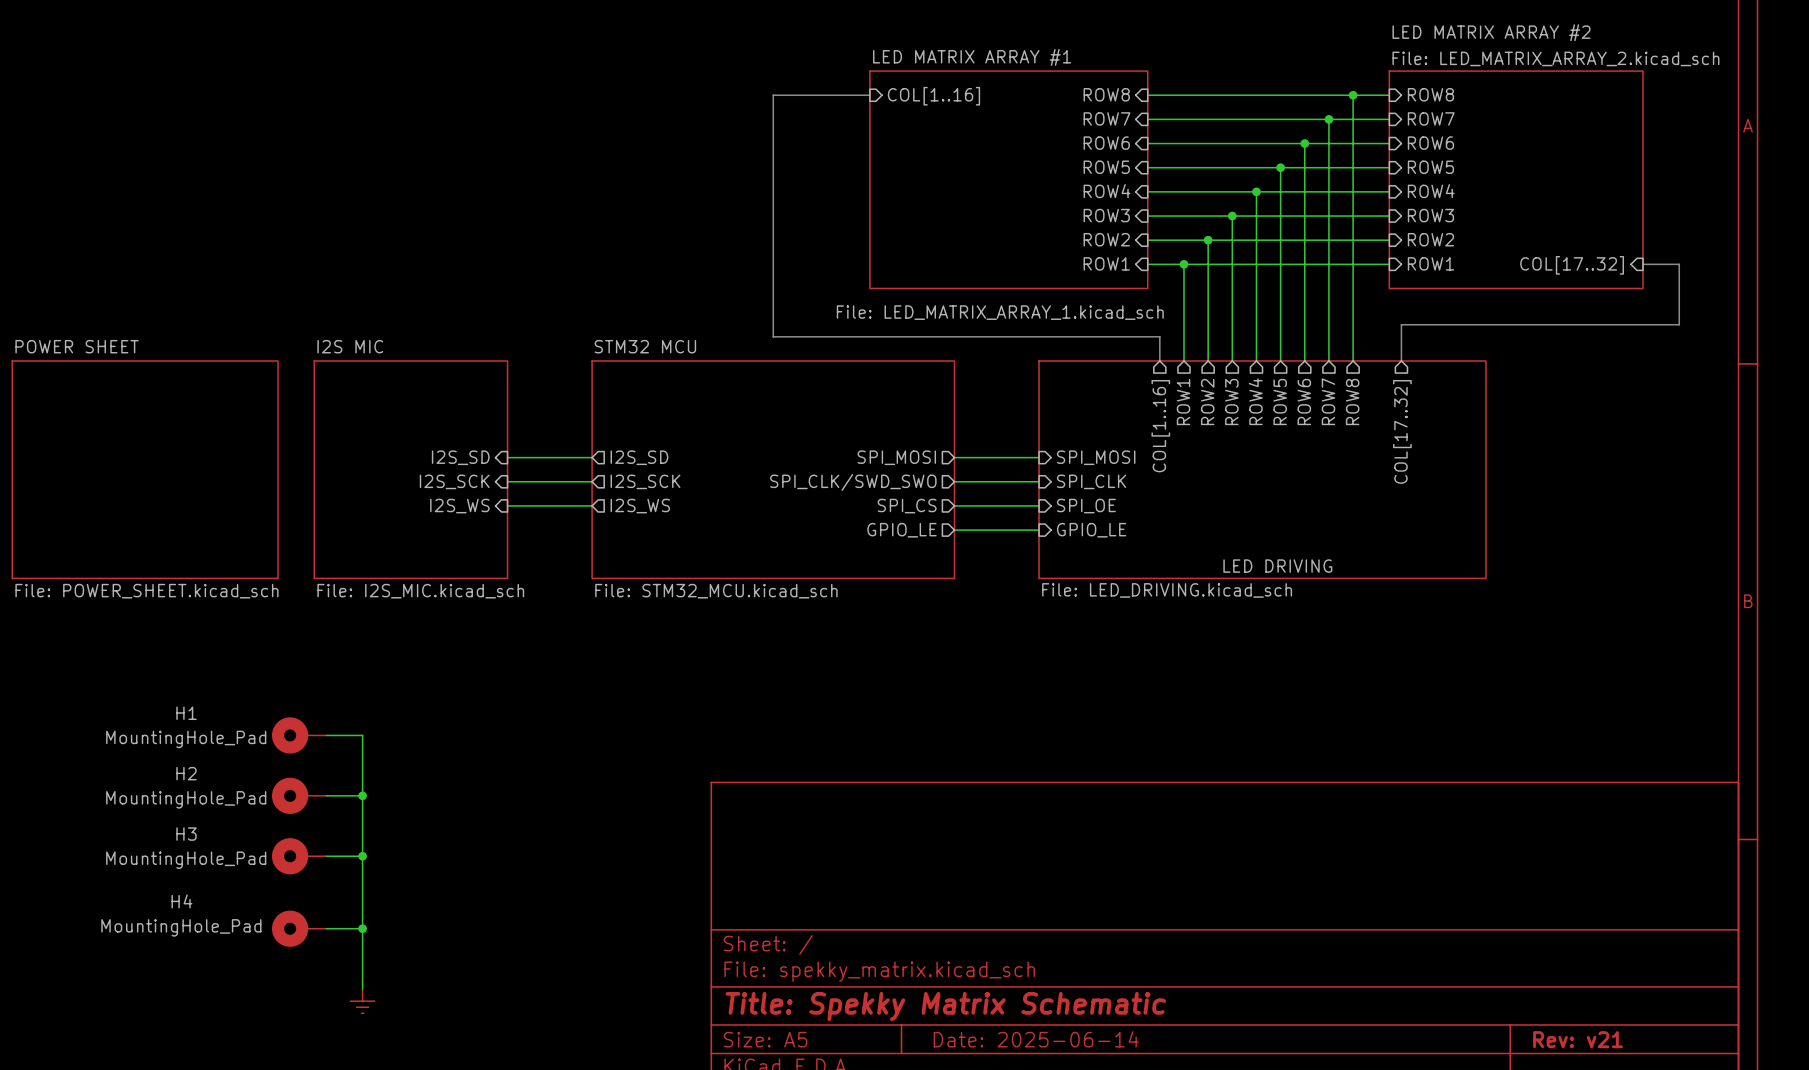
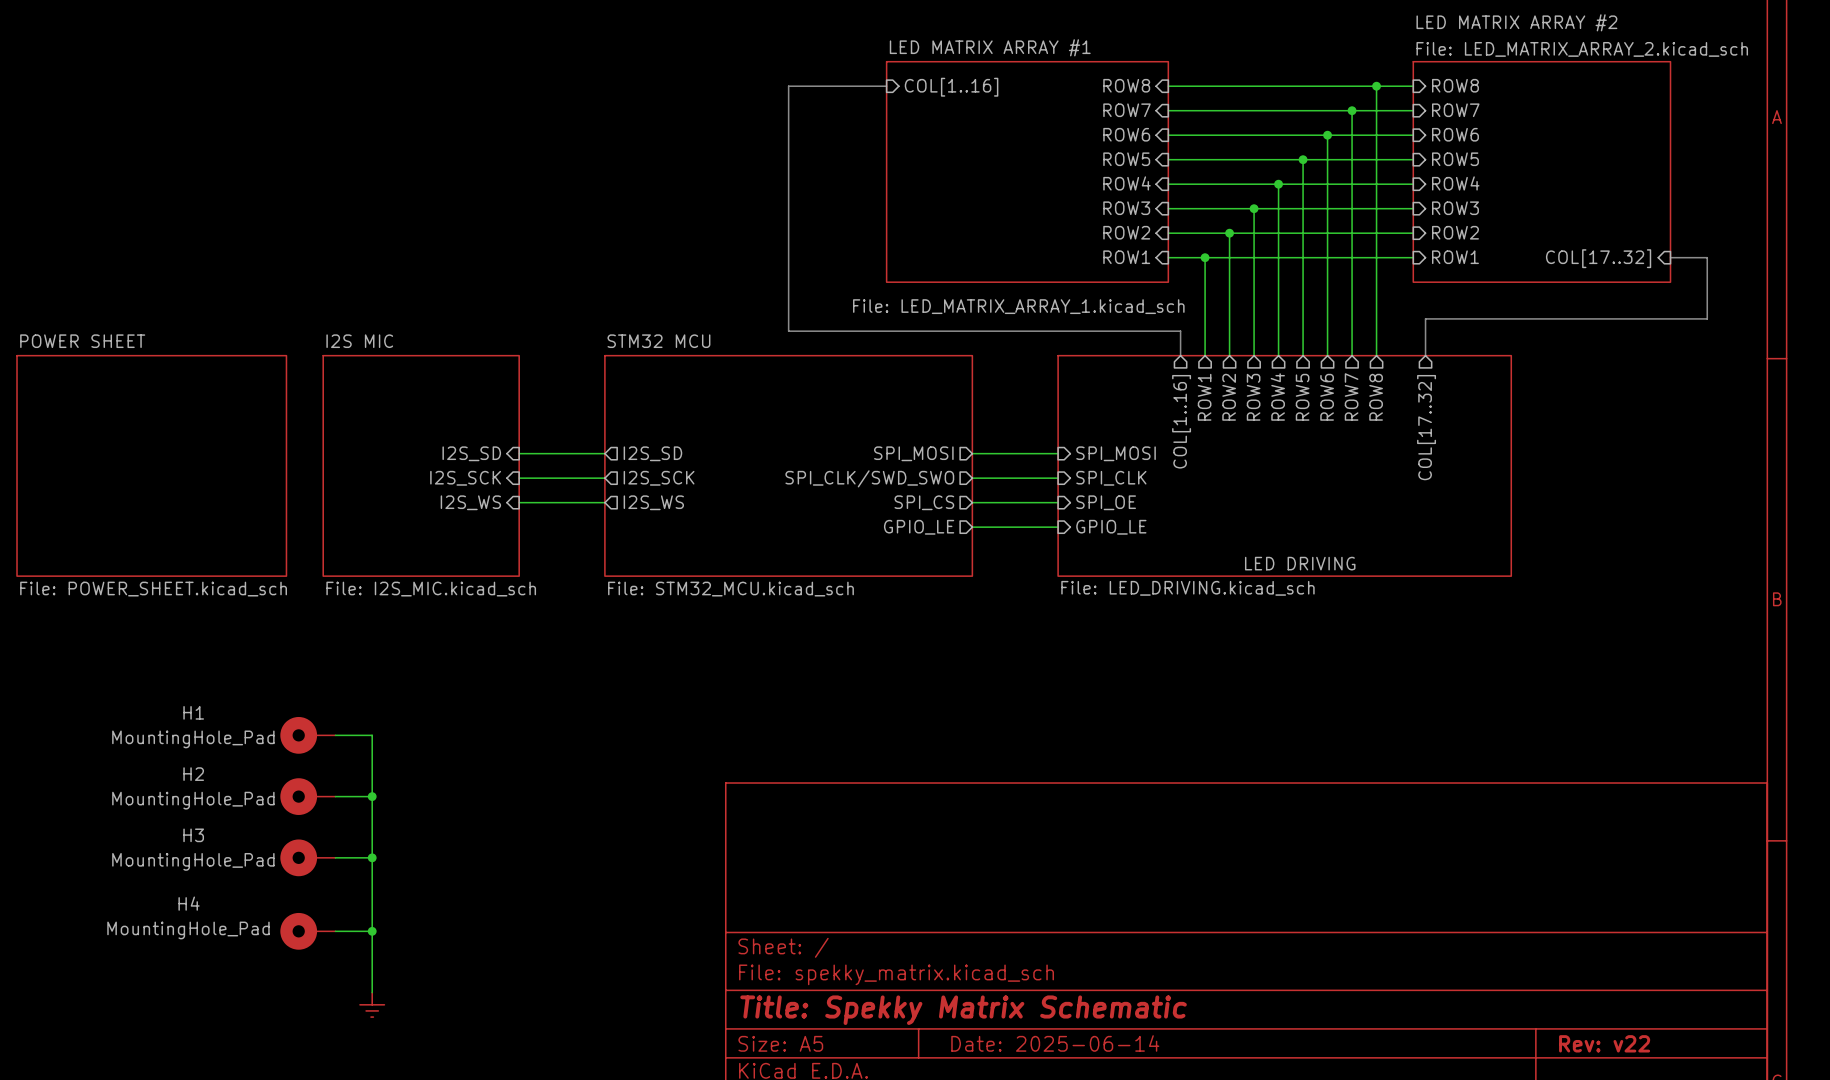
title block: Rev: v21 (1578, 1039) -> Rev: v22 (1604, 1043)

